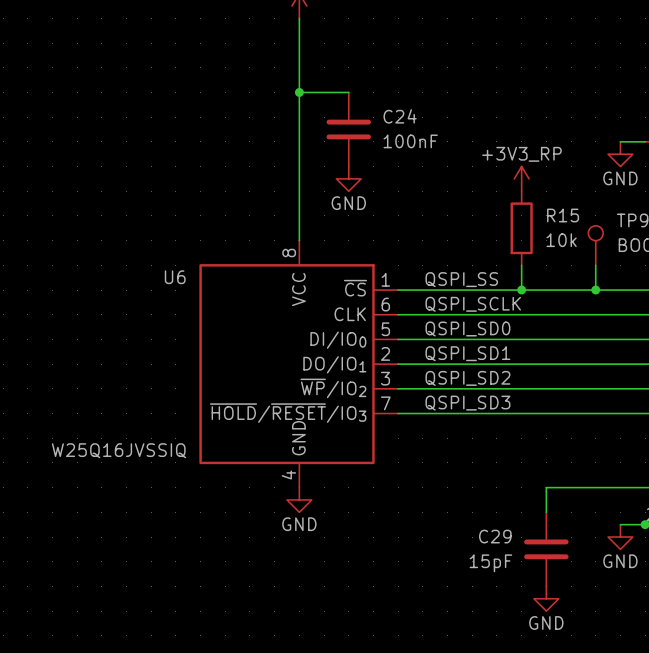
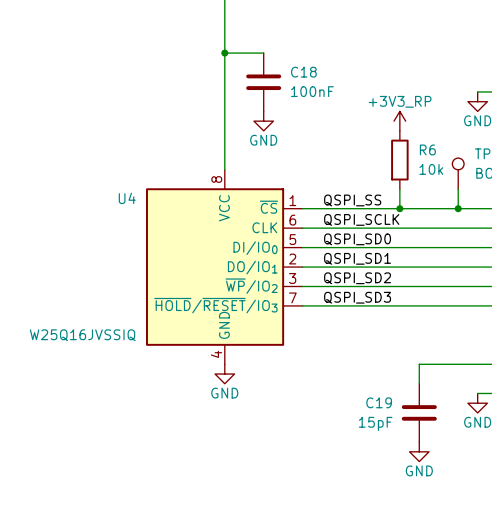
C24 name: C24 (400, 116) -> C18 (303, 72)
R15 name: R15 (563, 215) -> R6 (427, 149)
U6 name: U6 (175, 277) -> U4 (127, 198)
C29 name: C29 (495, 536) -> C19 (379, 402)

